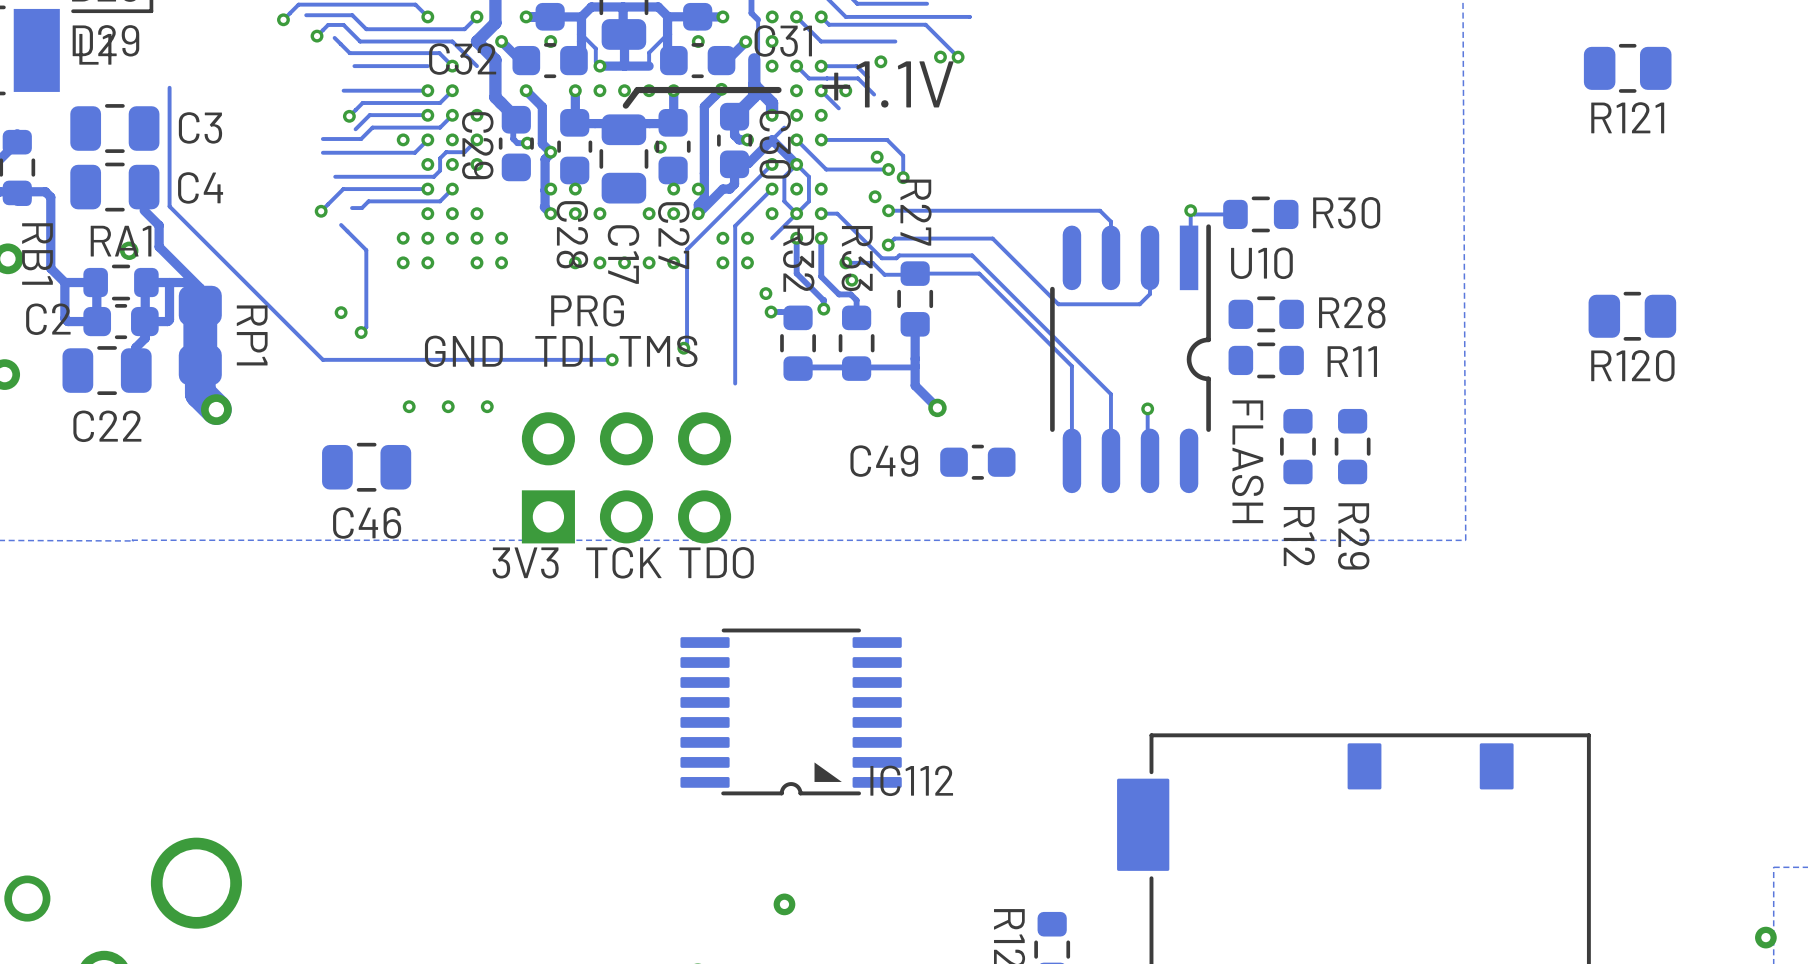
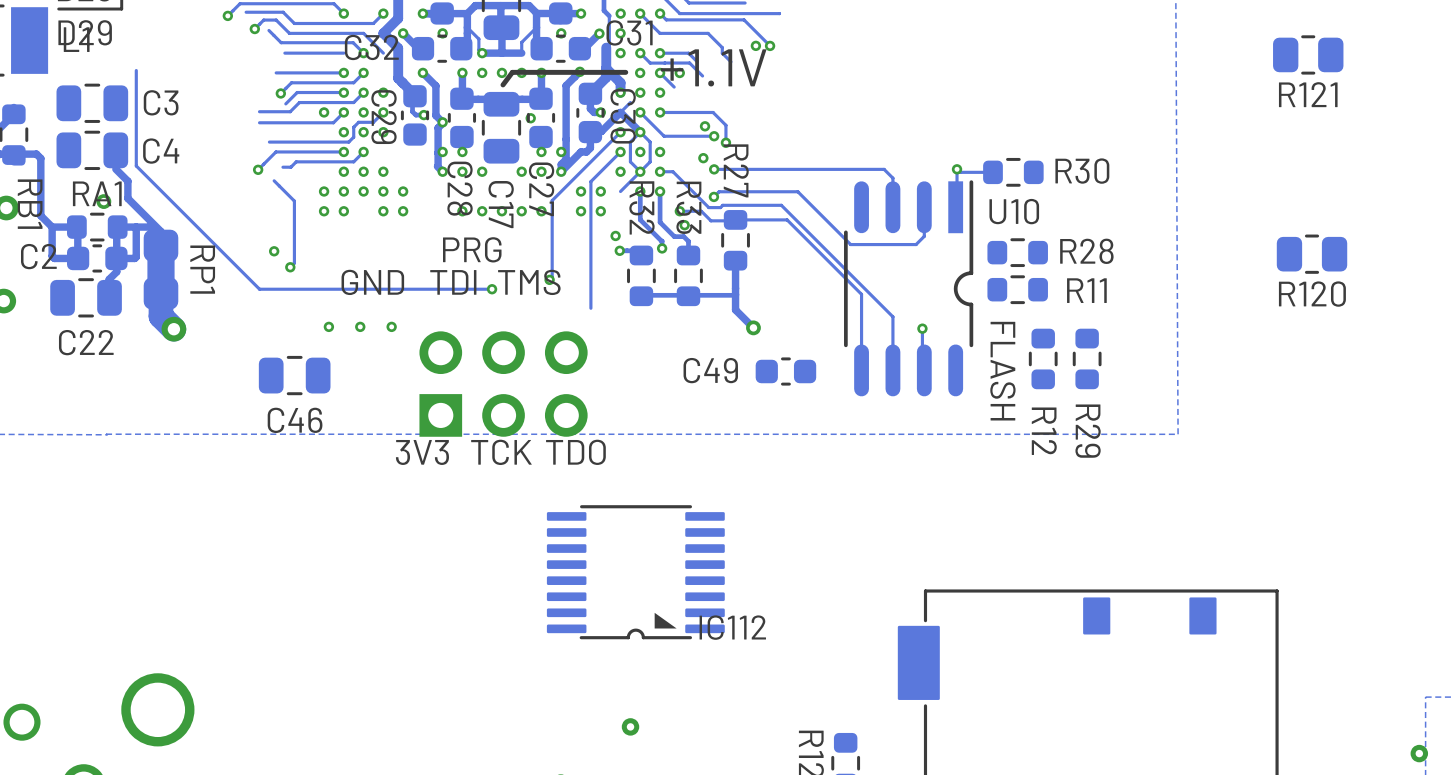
track: (895, 41) (880, 41) -> (730, 61) (722, 53) (722, 47) (708, 33)
via: (880, 61) -> none

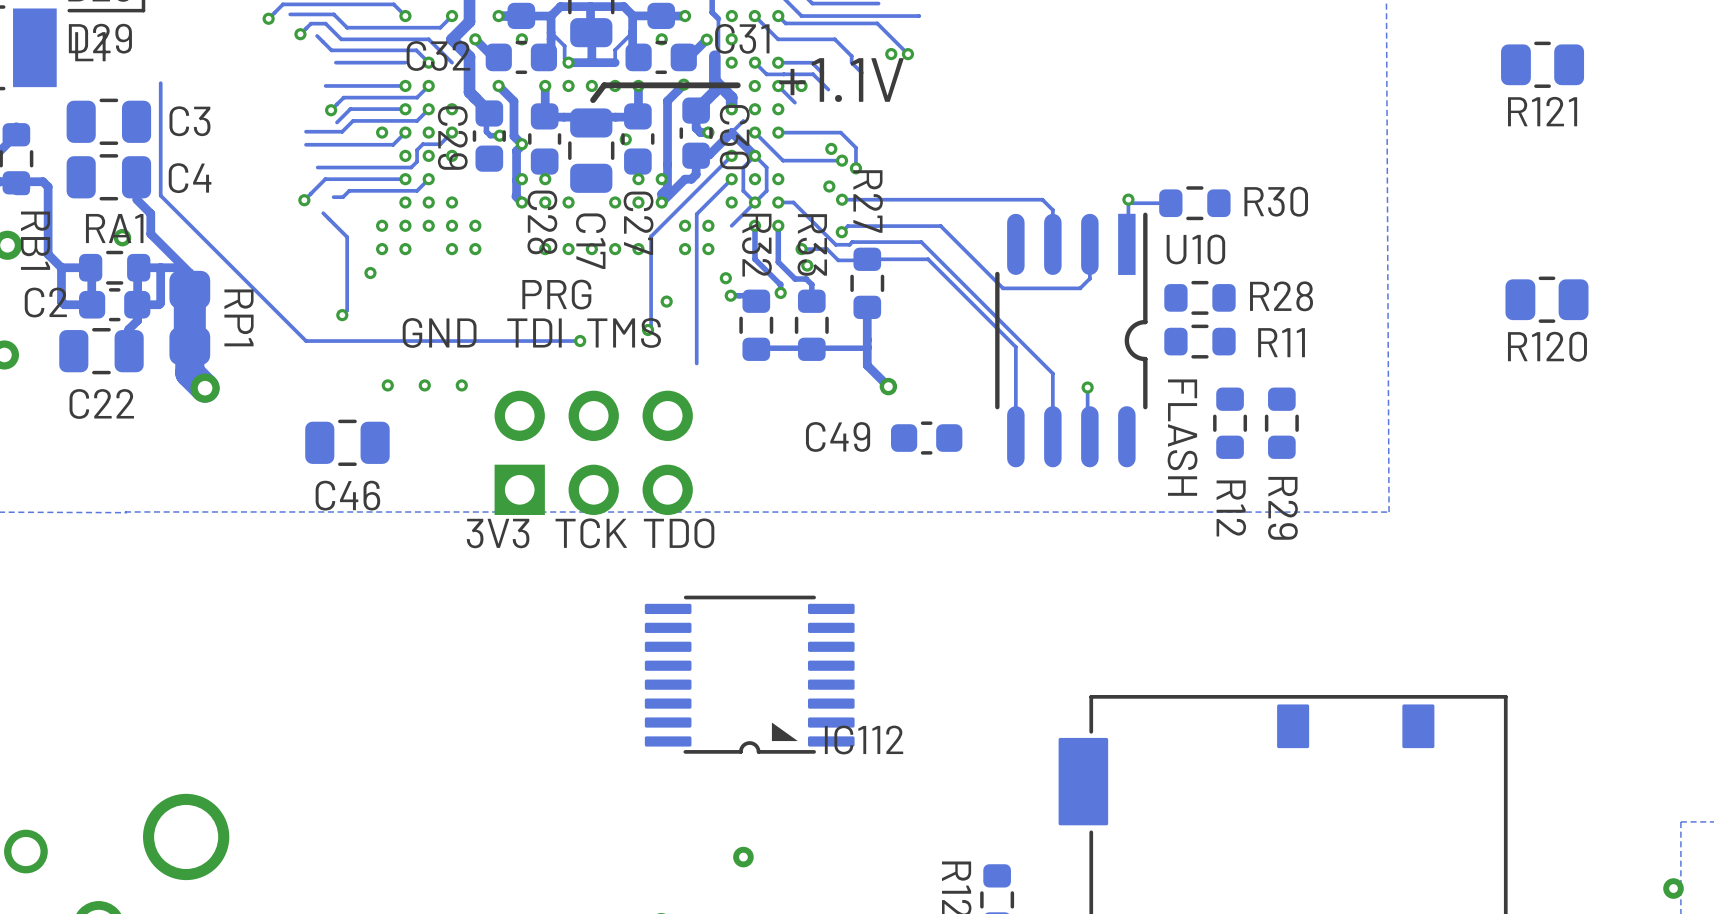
via position: (274, 251) -> (370, 273)
via: none -> (666, 301)

